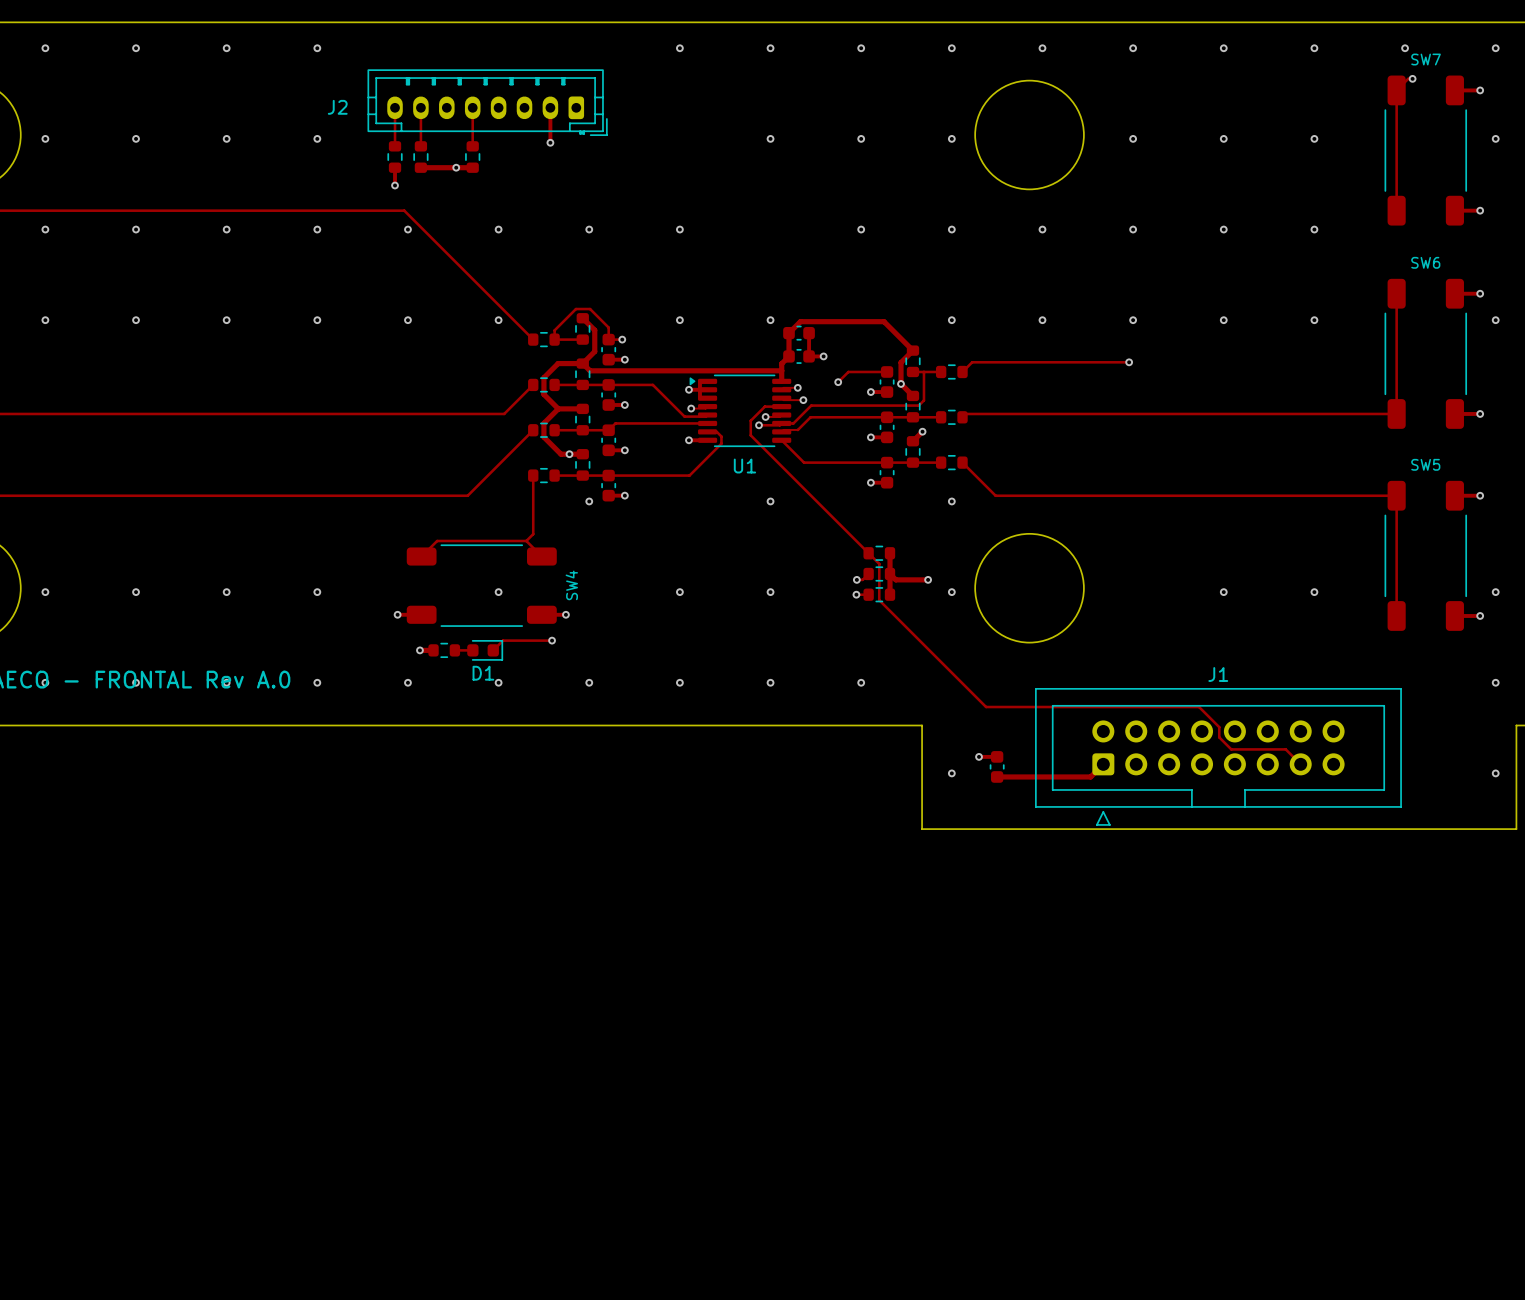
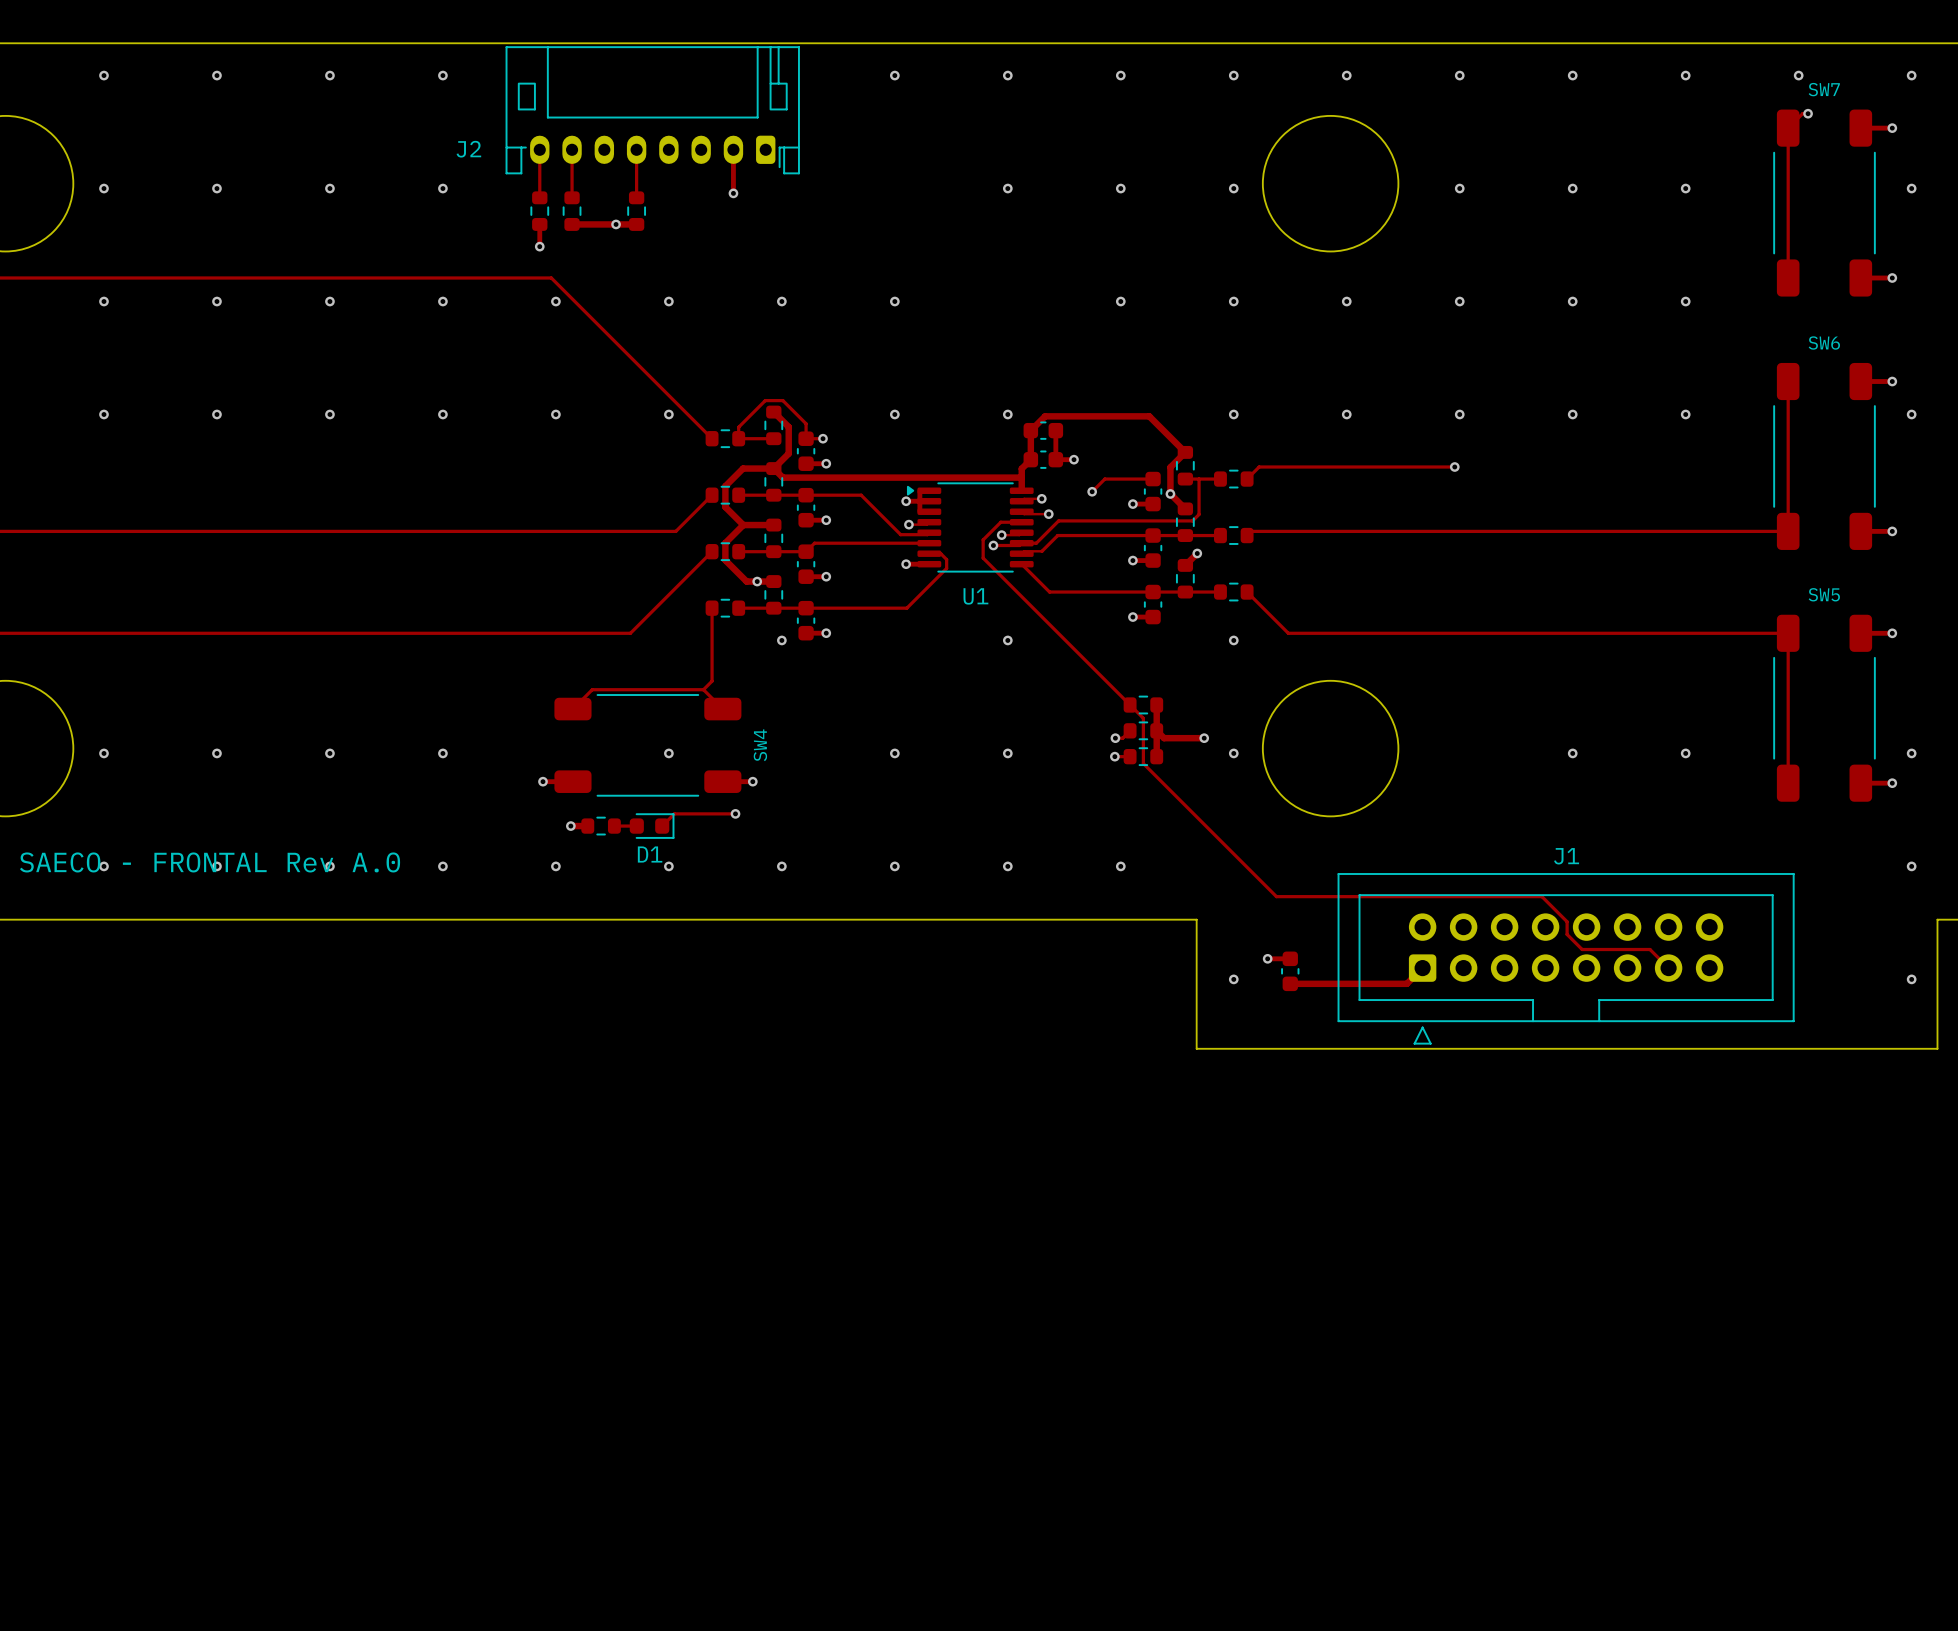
J2 footprint: [367, 69, 608, 136] -> [505, 46, 800, 175]

